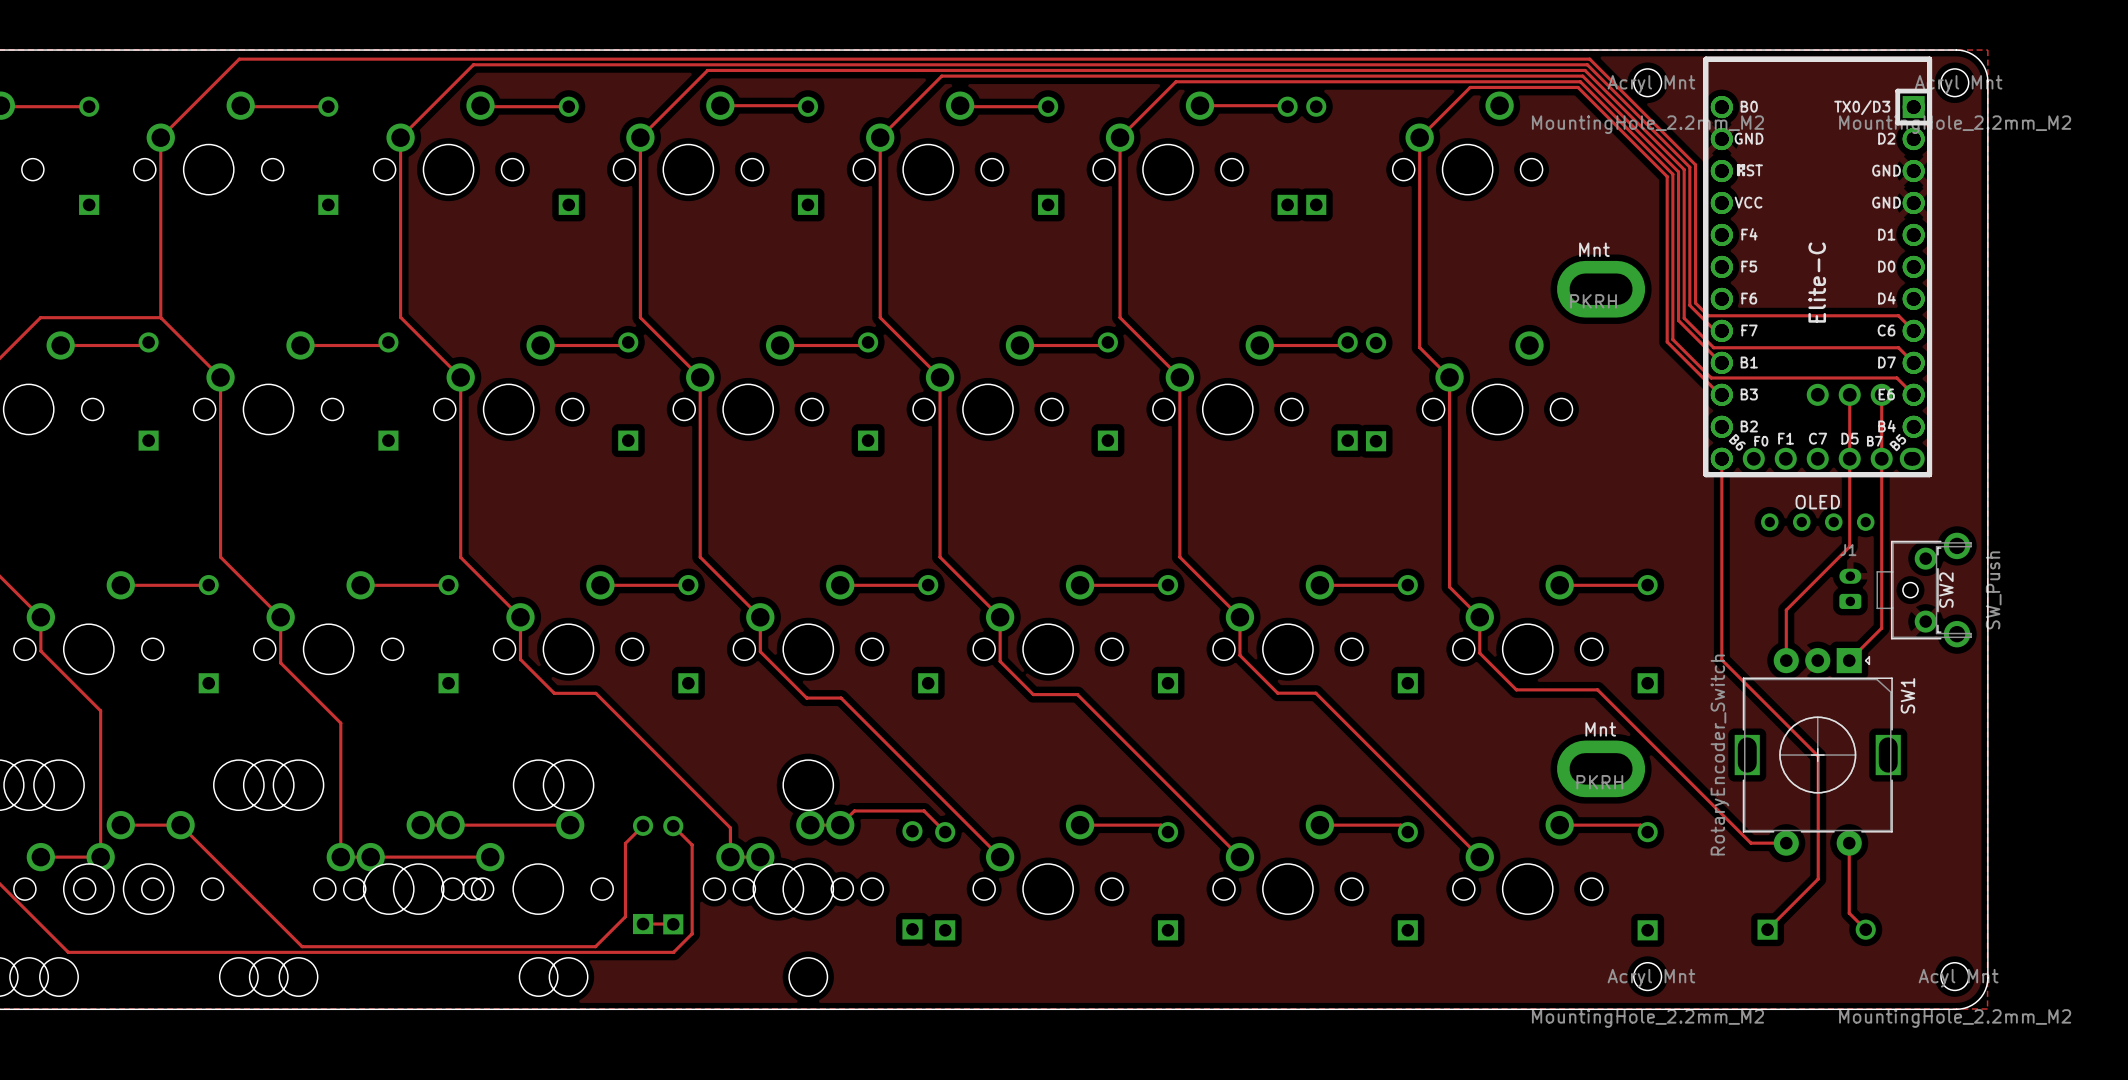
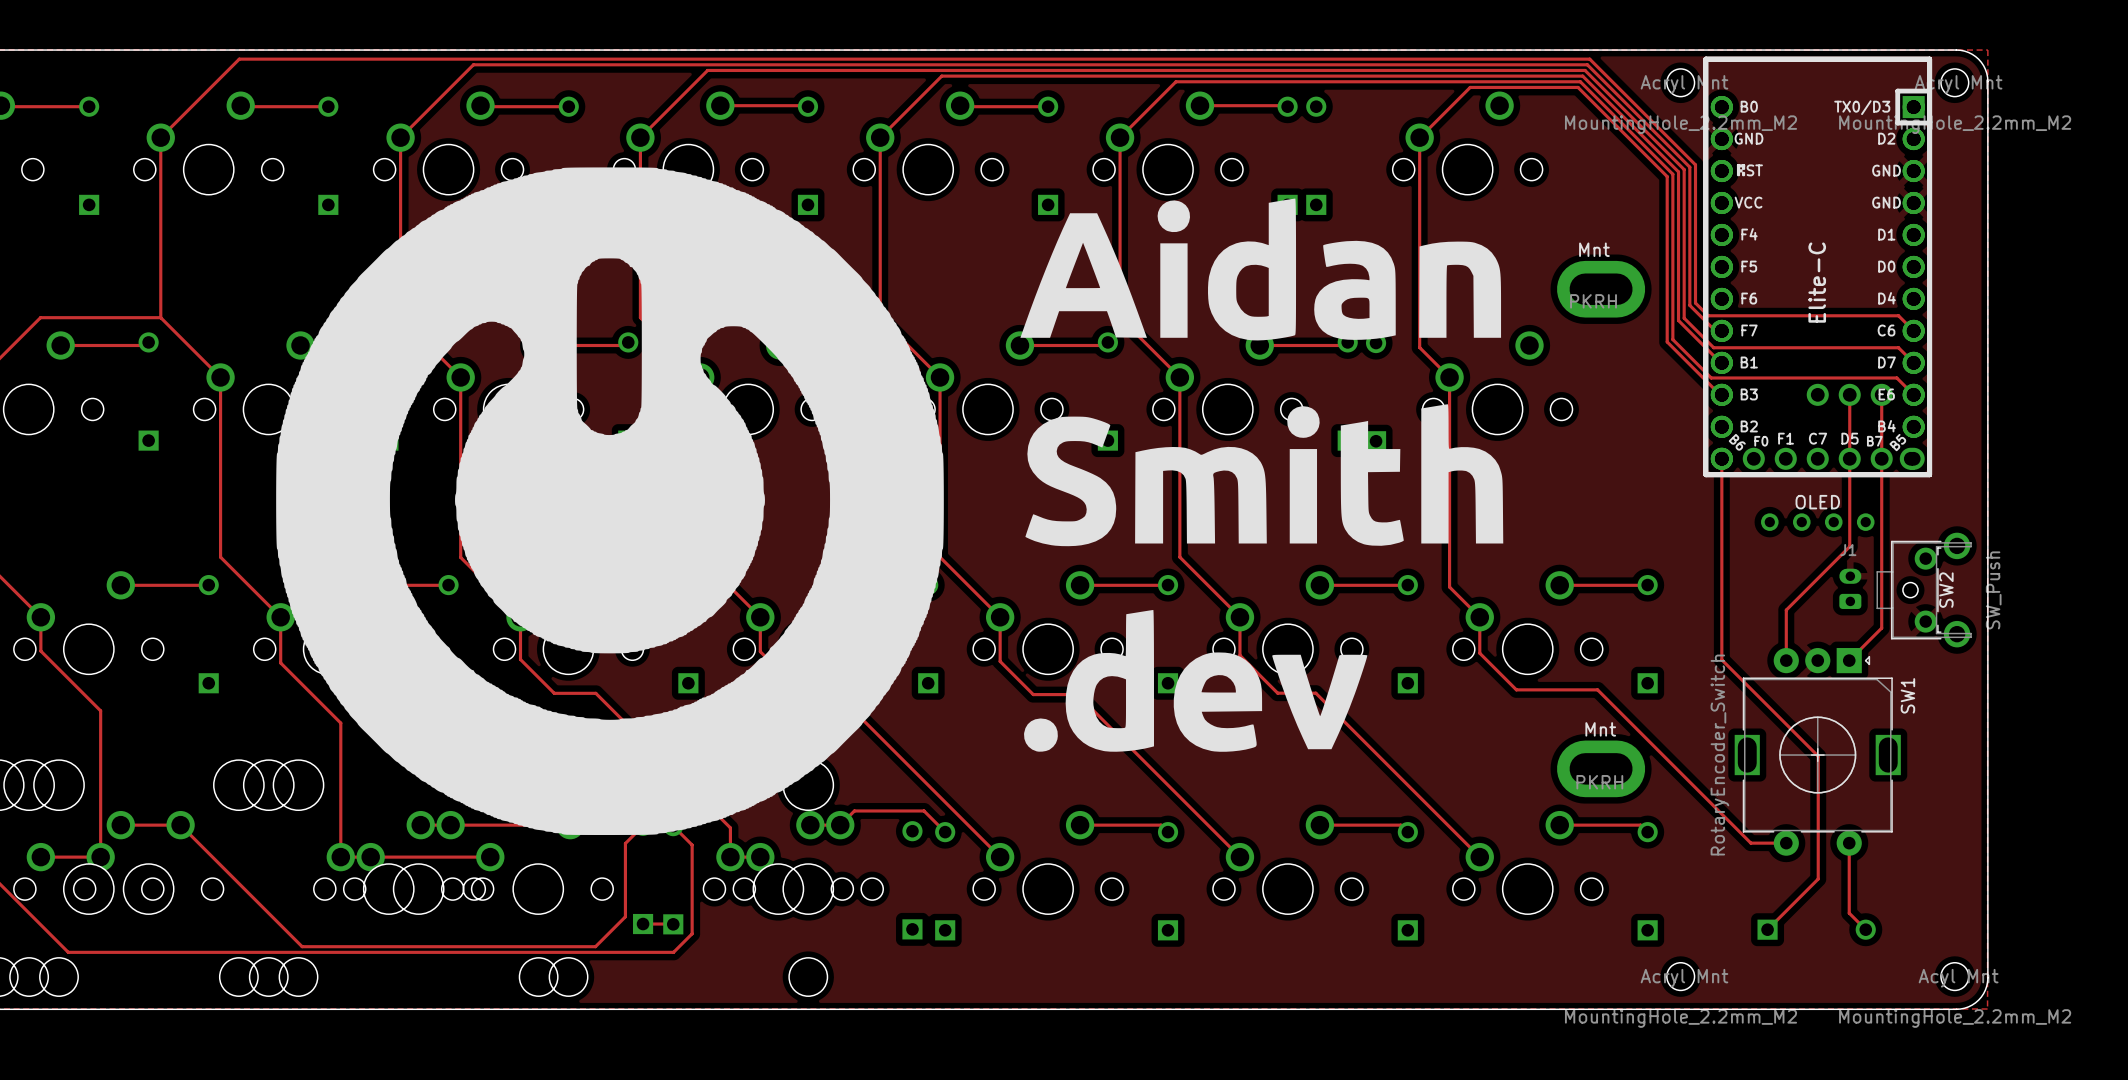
Acryl Mnt position: (1647, 82) -> (1680, 82)
part: none -> (889, 501)
Acryl Mnt position: (1647, 976) -> (1680, 976)

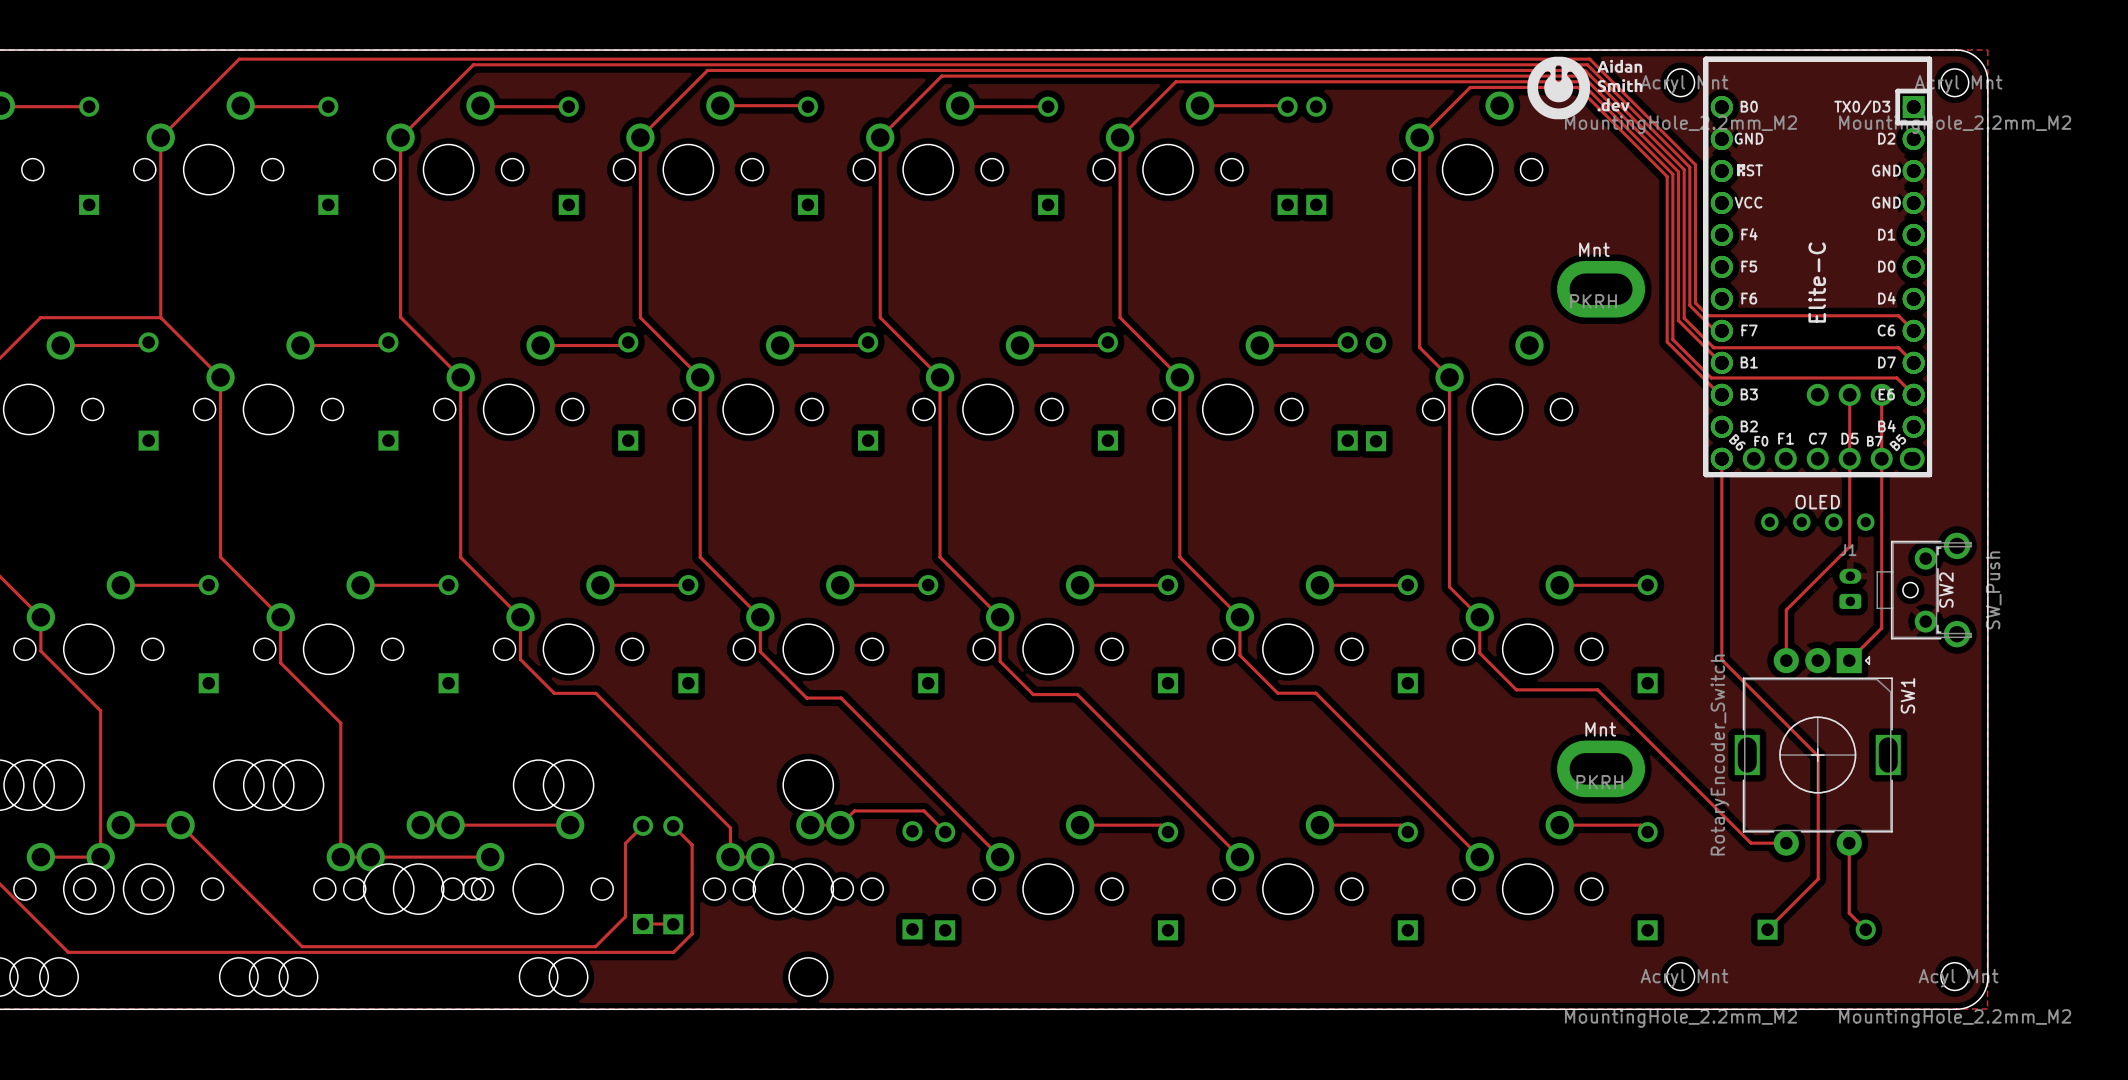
drawing: none -> [1527, 56, 1643, 120]
part: (889, 501) -> none

